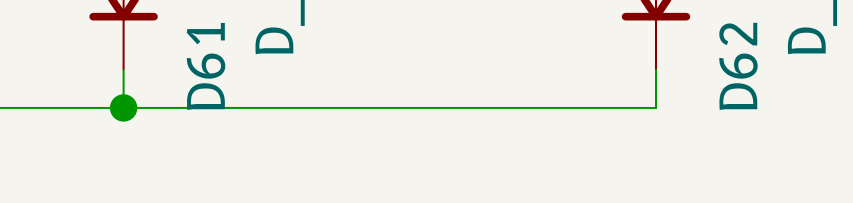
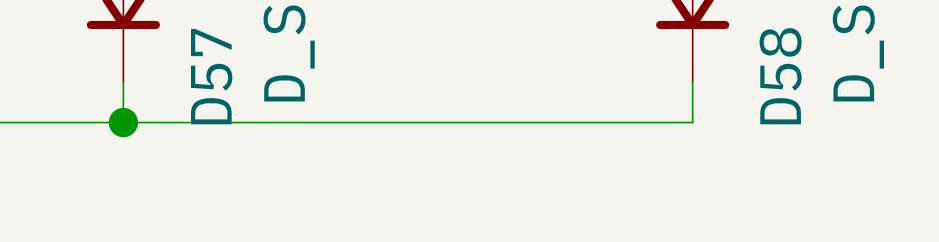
D61 name: D61 (206, 66) -> D57 (211, 76)
D62 name: D62 (738, 66) -> D58 (780, 76)

